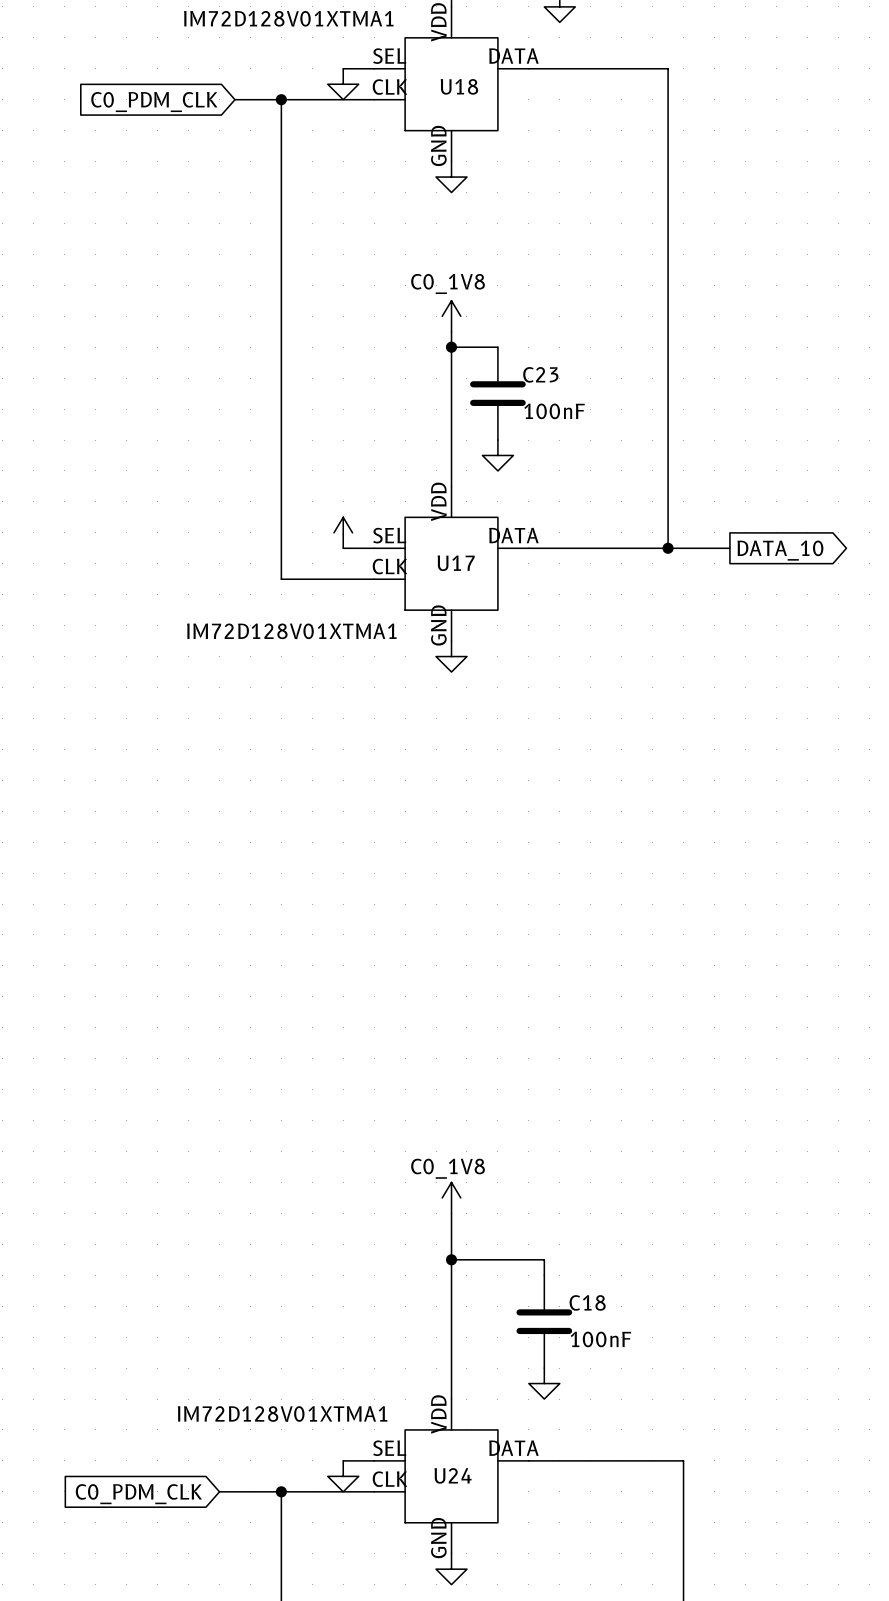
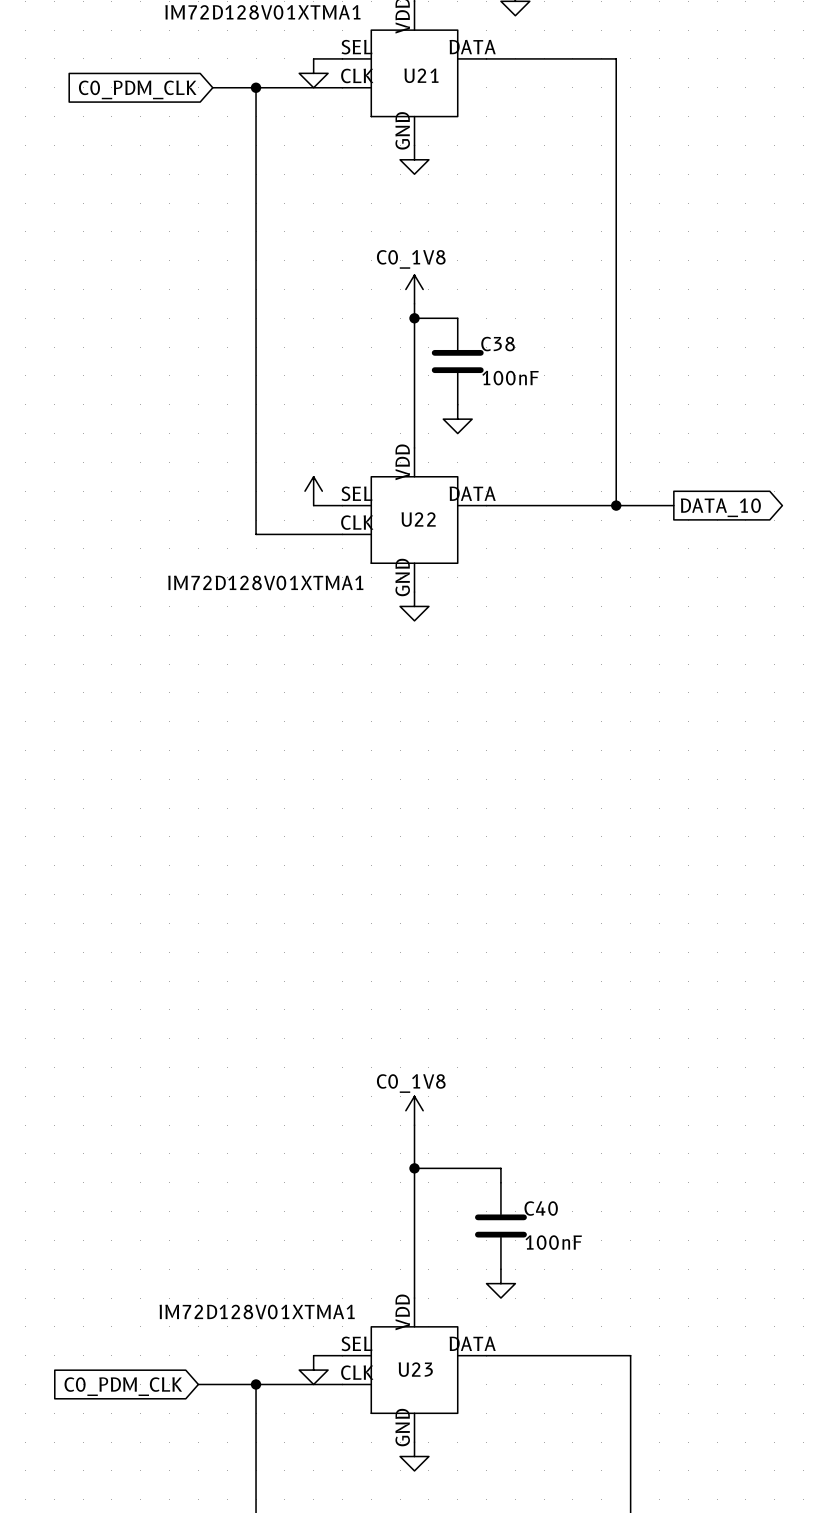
U18 name: U18 (459, 86) -> U21 (421, 75)
C23 name: C23 (540, 374) -> C38 (498, 344)
U17 name: U17 (456, 563) -> U22 (418, 519)
C18 name: C18 (587, 1302) -> C40 (541, 1208)
U24 name: U24 (453, 1475) -> U23 (415, 1369)

